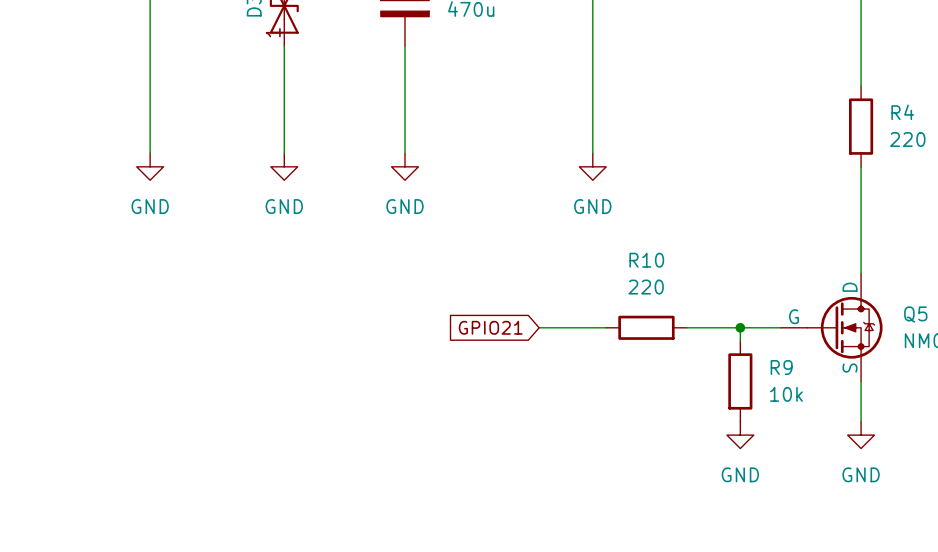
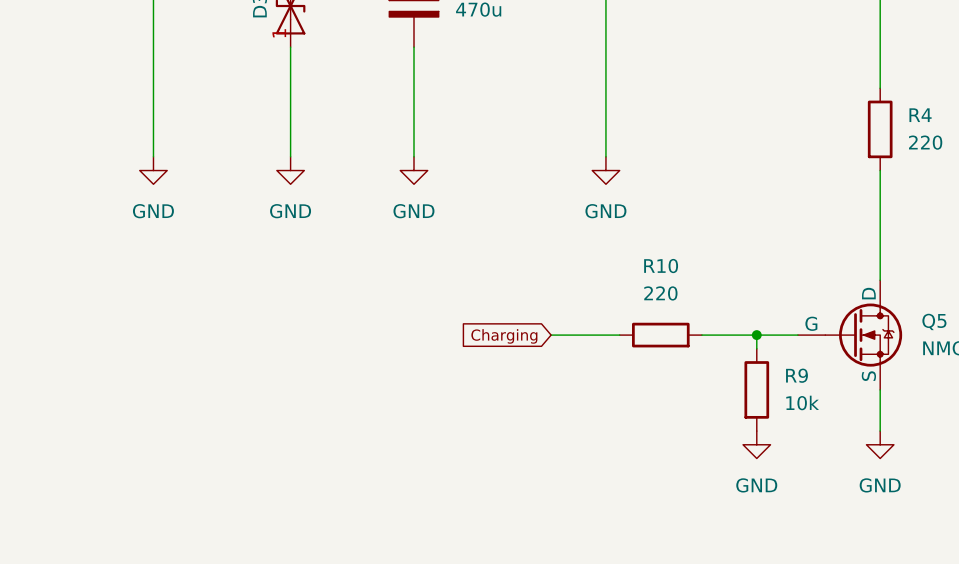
global label: GPIO21 (490, 327) -> Charging (504, 336)

